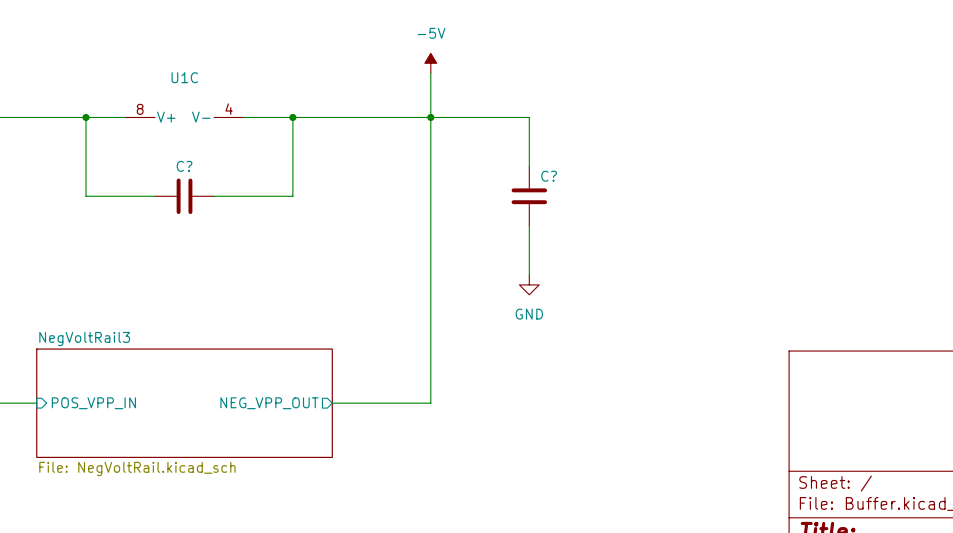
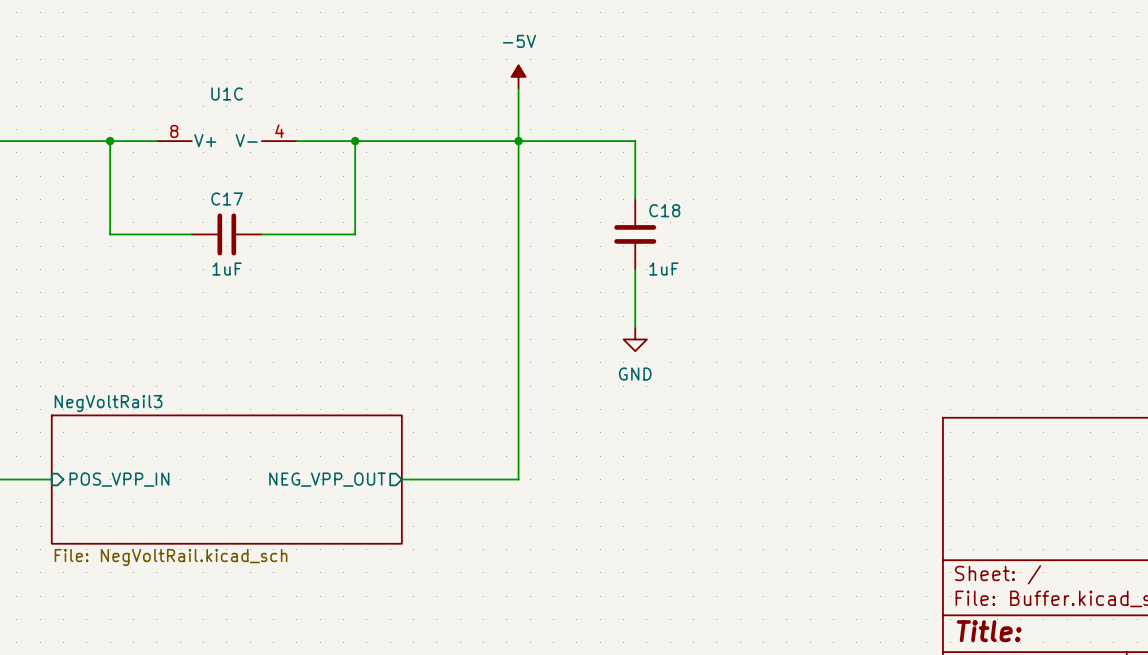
C? name: C? (184, 166) -> C17 (227, 199)
C? name: C? (549, 176) -> C18 (664, 210)
C? value: none -> 1uF (227, 269)
C? value: none -> 1uF (663, 269)

